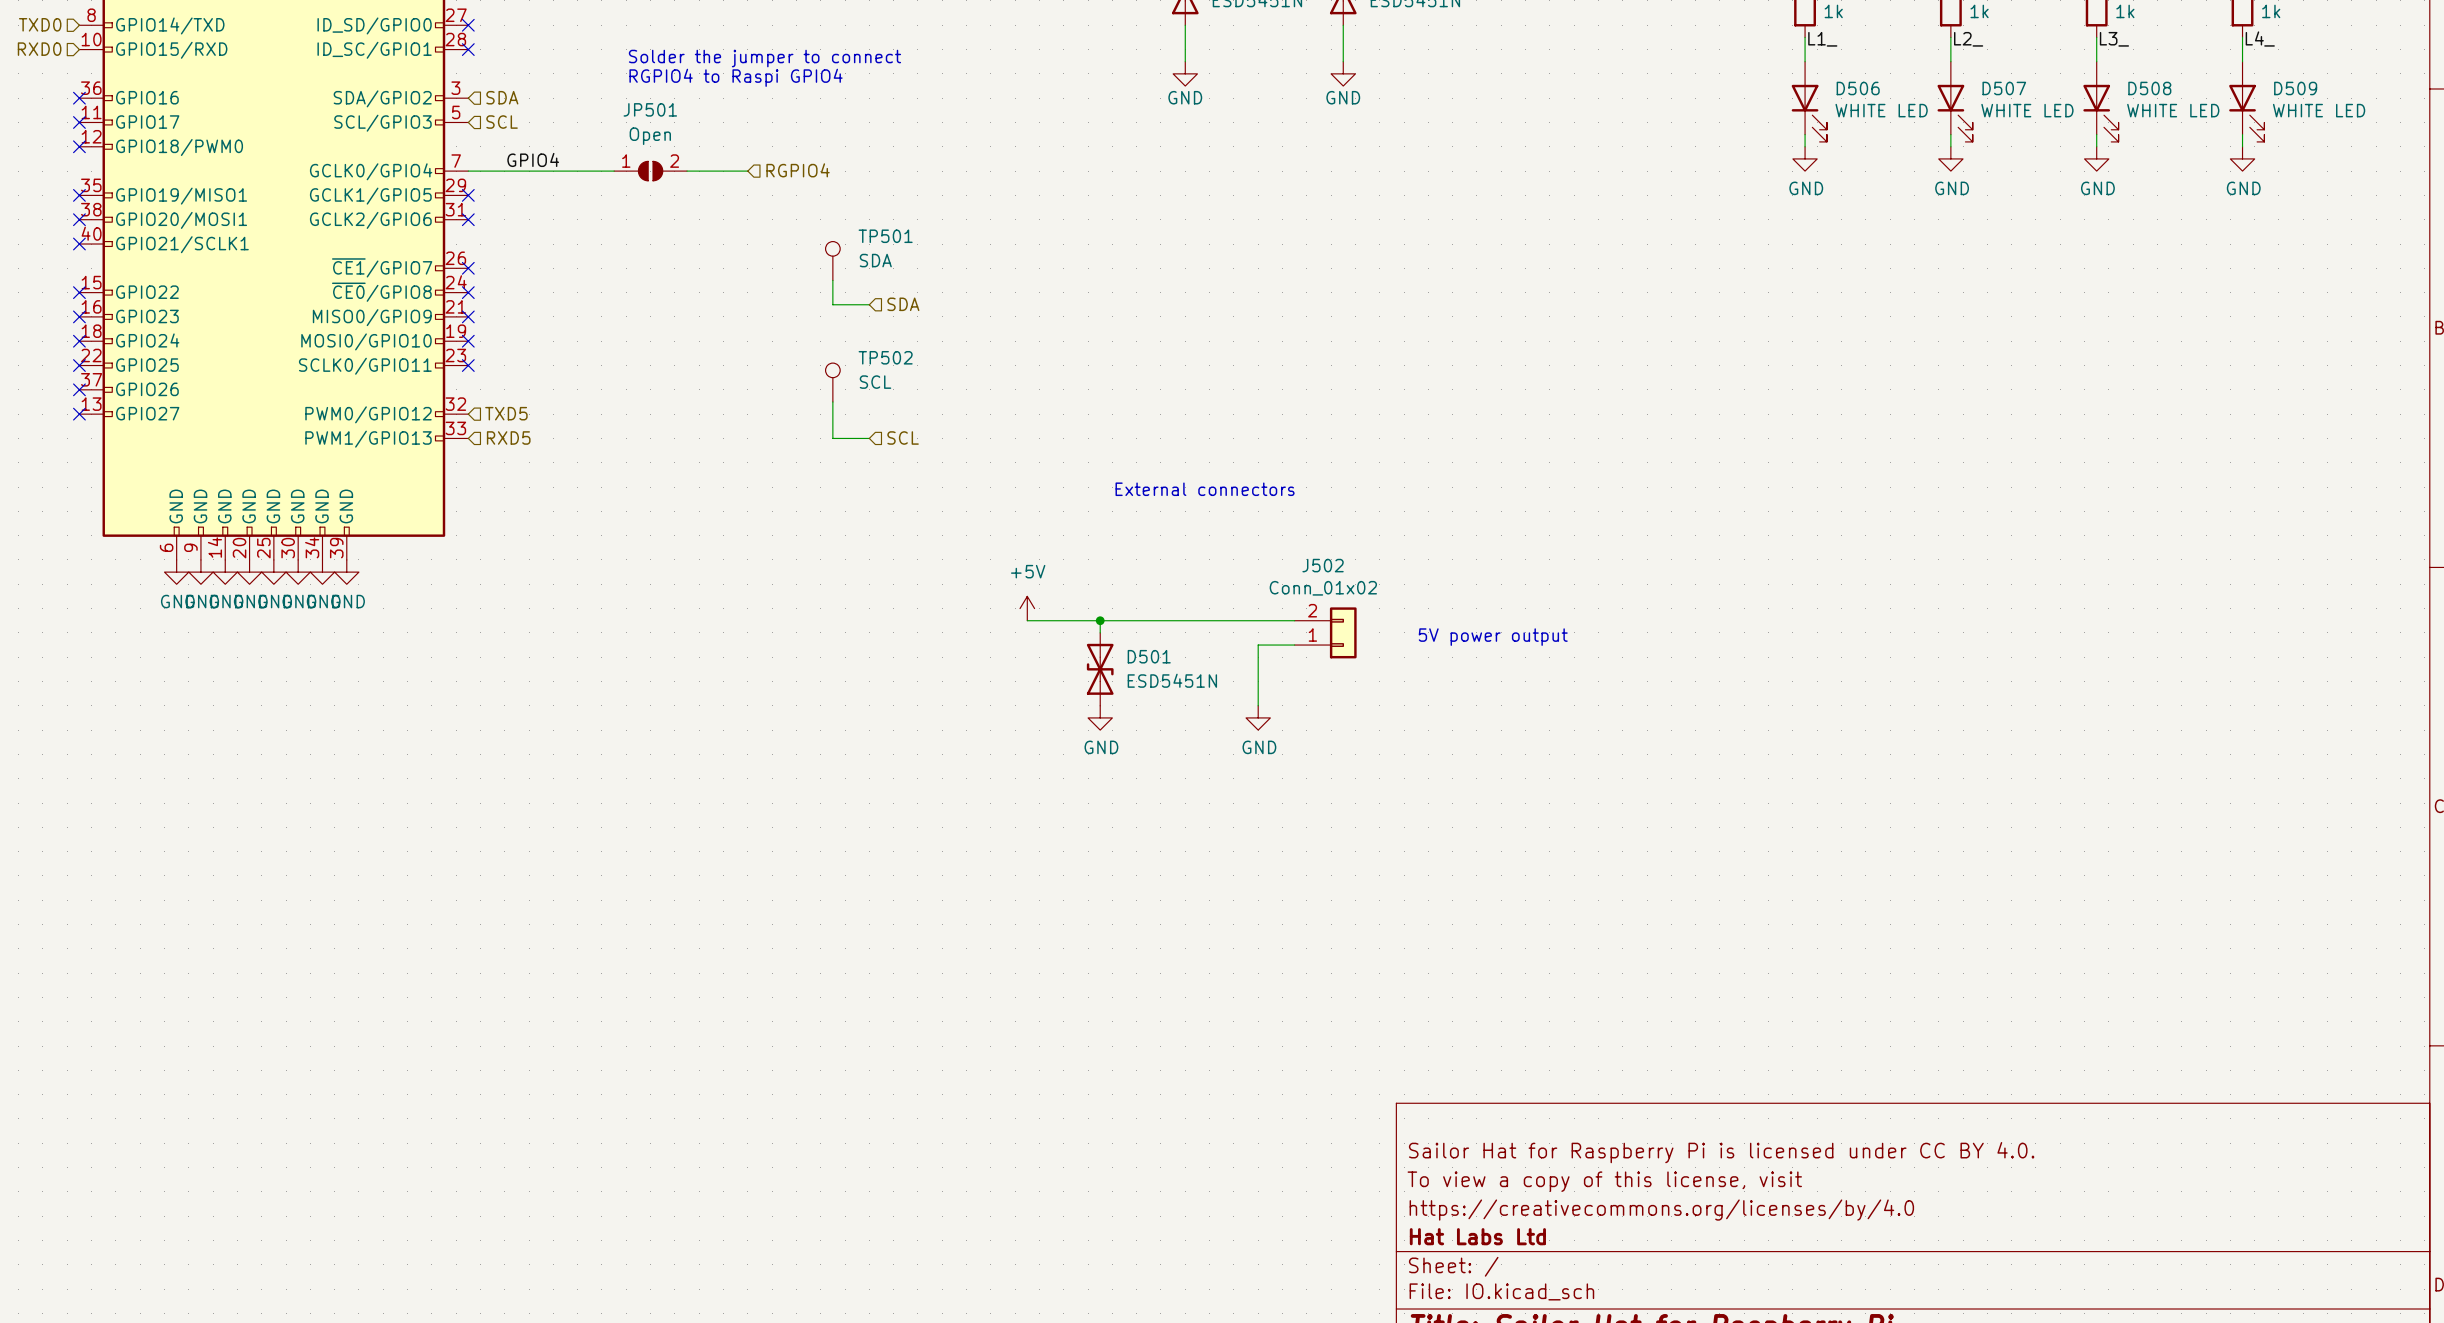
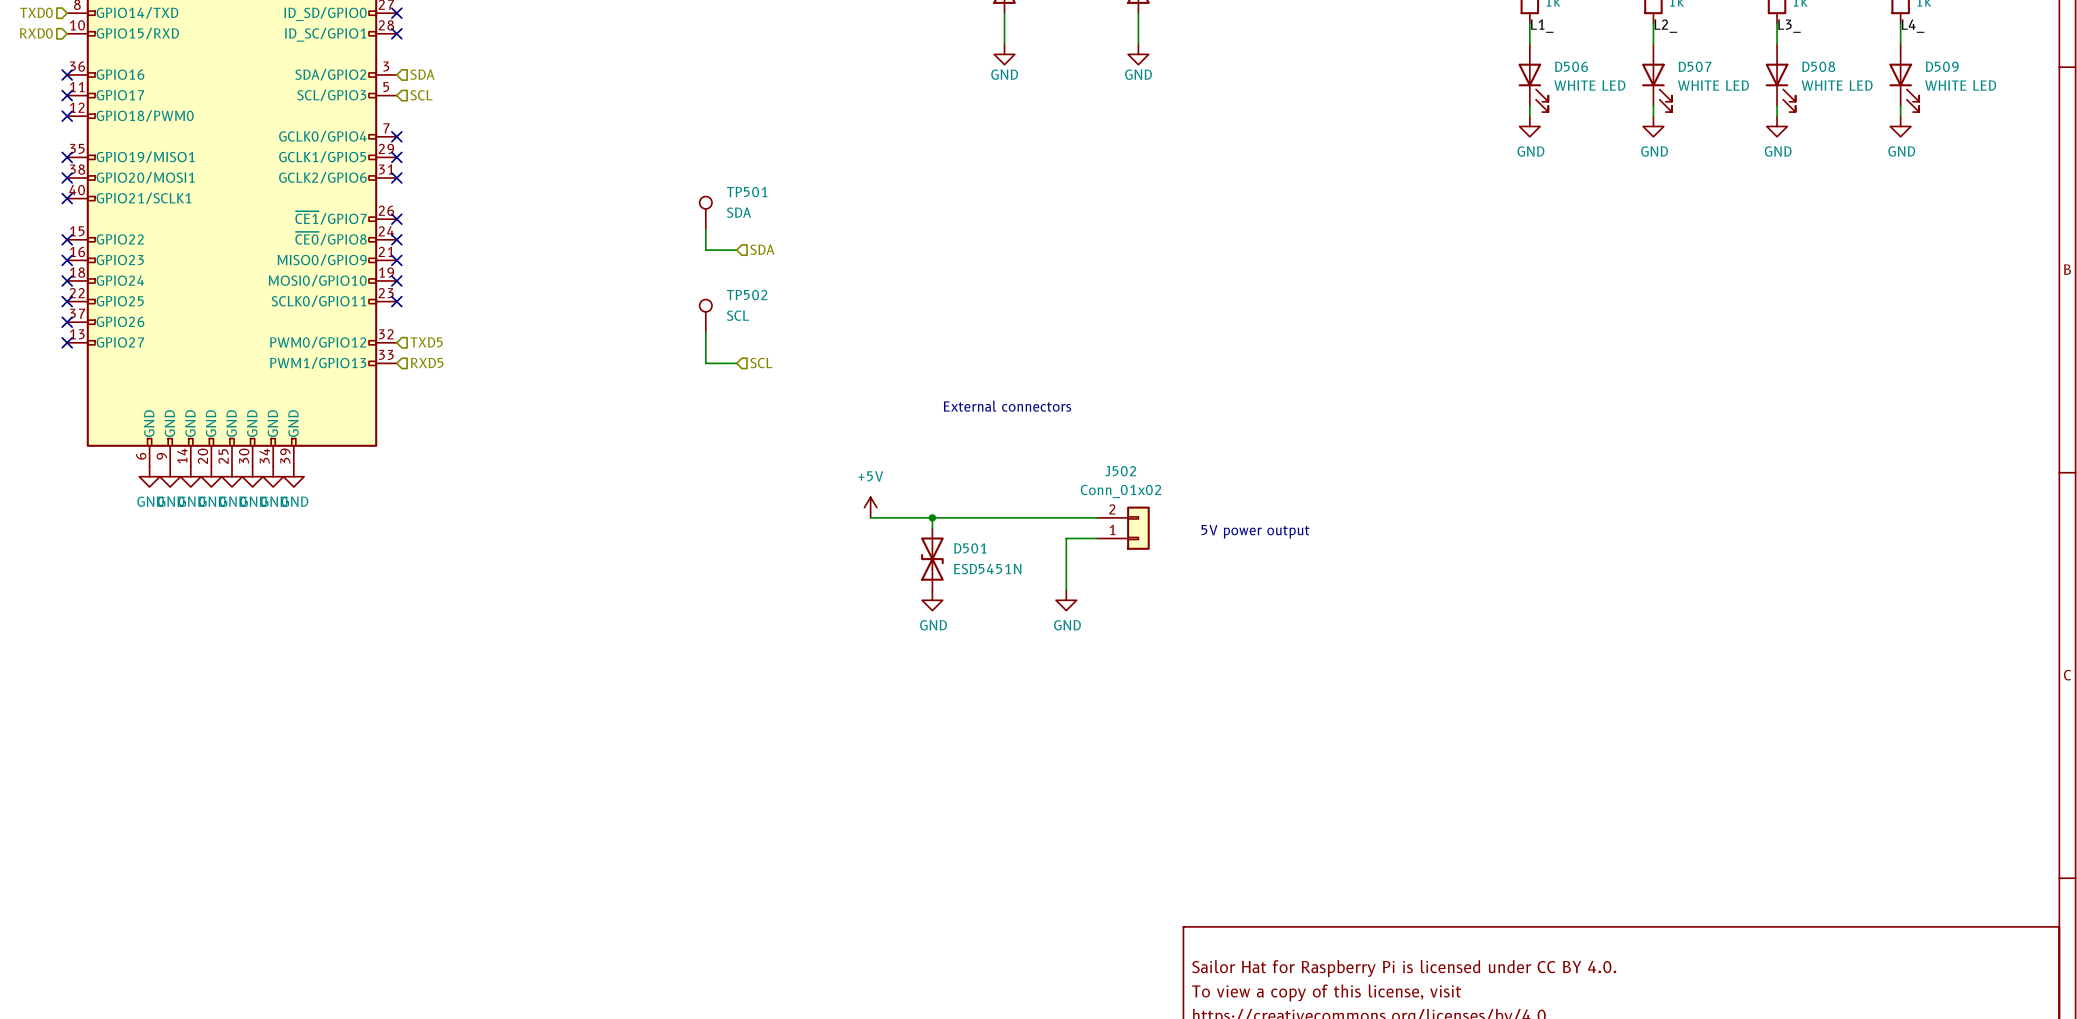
text: Solder the jumper to connect (764, 58) -> none
text: RGPIO4 to Raspi GPIO4 (736, 77) -> none
label: GPIO4 (533, 159) -> none
hierarchical label: RGPIO4 (798, 170) -> none
wire: (468, 171) (614, 171) -> none
no-connect mark: none -> (396, 136)
JP501: Open (650, 171) -> none
wire: (687, 171) (747, 171) -> none

